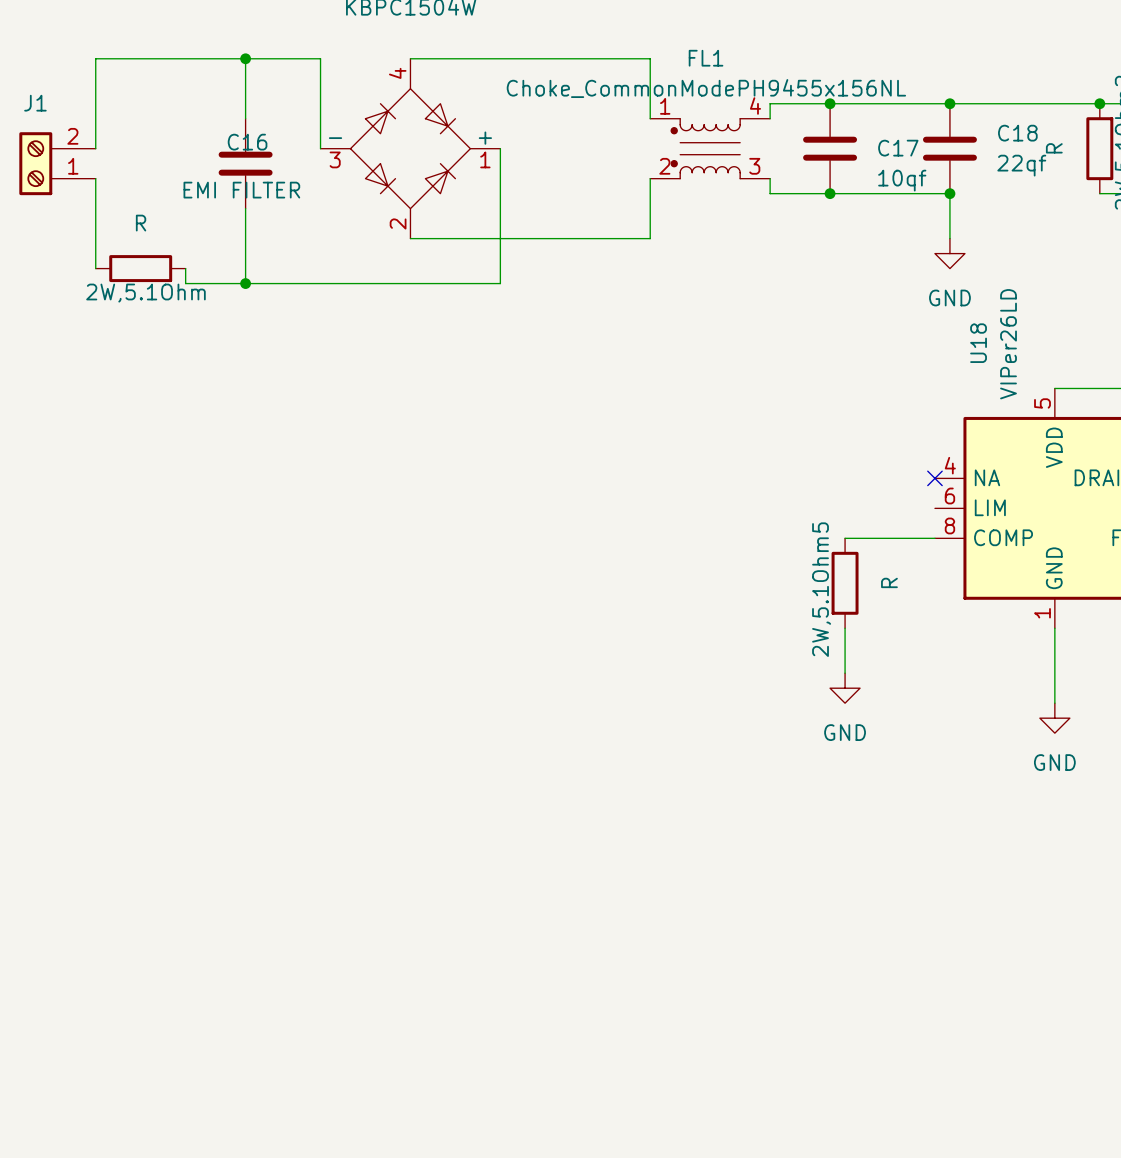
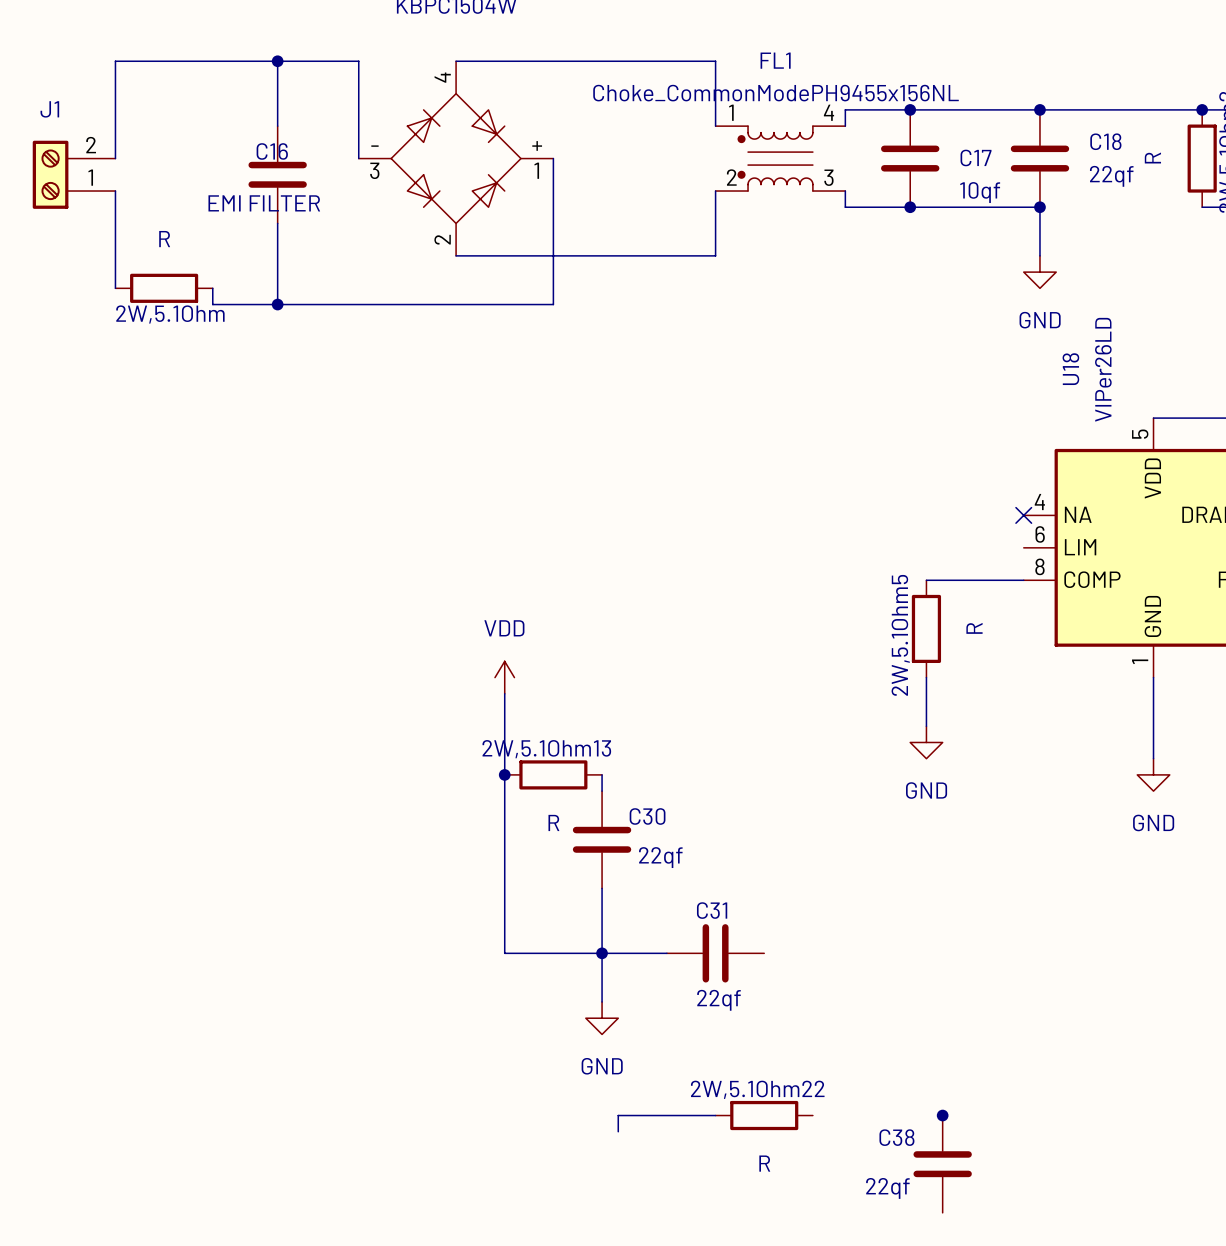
power symbol: none -> VDD (504, 677)
wire: none -> (504, 693) (504, 953) (666, 953)
junction: none -> (504, 774)
2W,5.1Ohm13: none -> R (553, 774)
wire: none -> (602, 774) (602, 791)
C30: none -> 22qf (602, 839)
wire: none -> (602, 888) (602, 1001)
junction: none -> (602, 953)
C31: none -> 22qf (715, 953)
power symbol: none -> GND (602, 1018)
wire: none -> (715, 1115) (618, 1115) (618, 1131)
2W,5.1Ohm22: none -> R (764, 1115)
junction: none -> (942, 1115)
C38: none -> 22qf (942, 1164)

